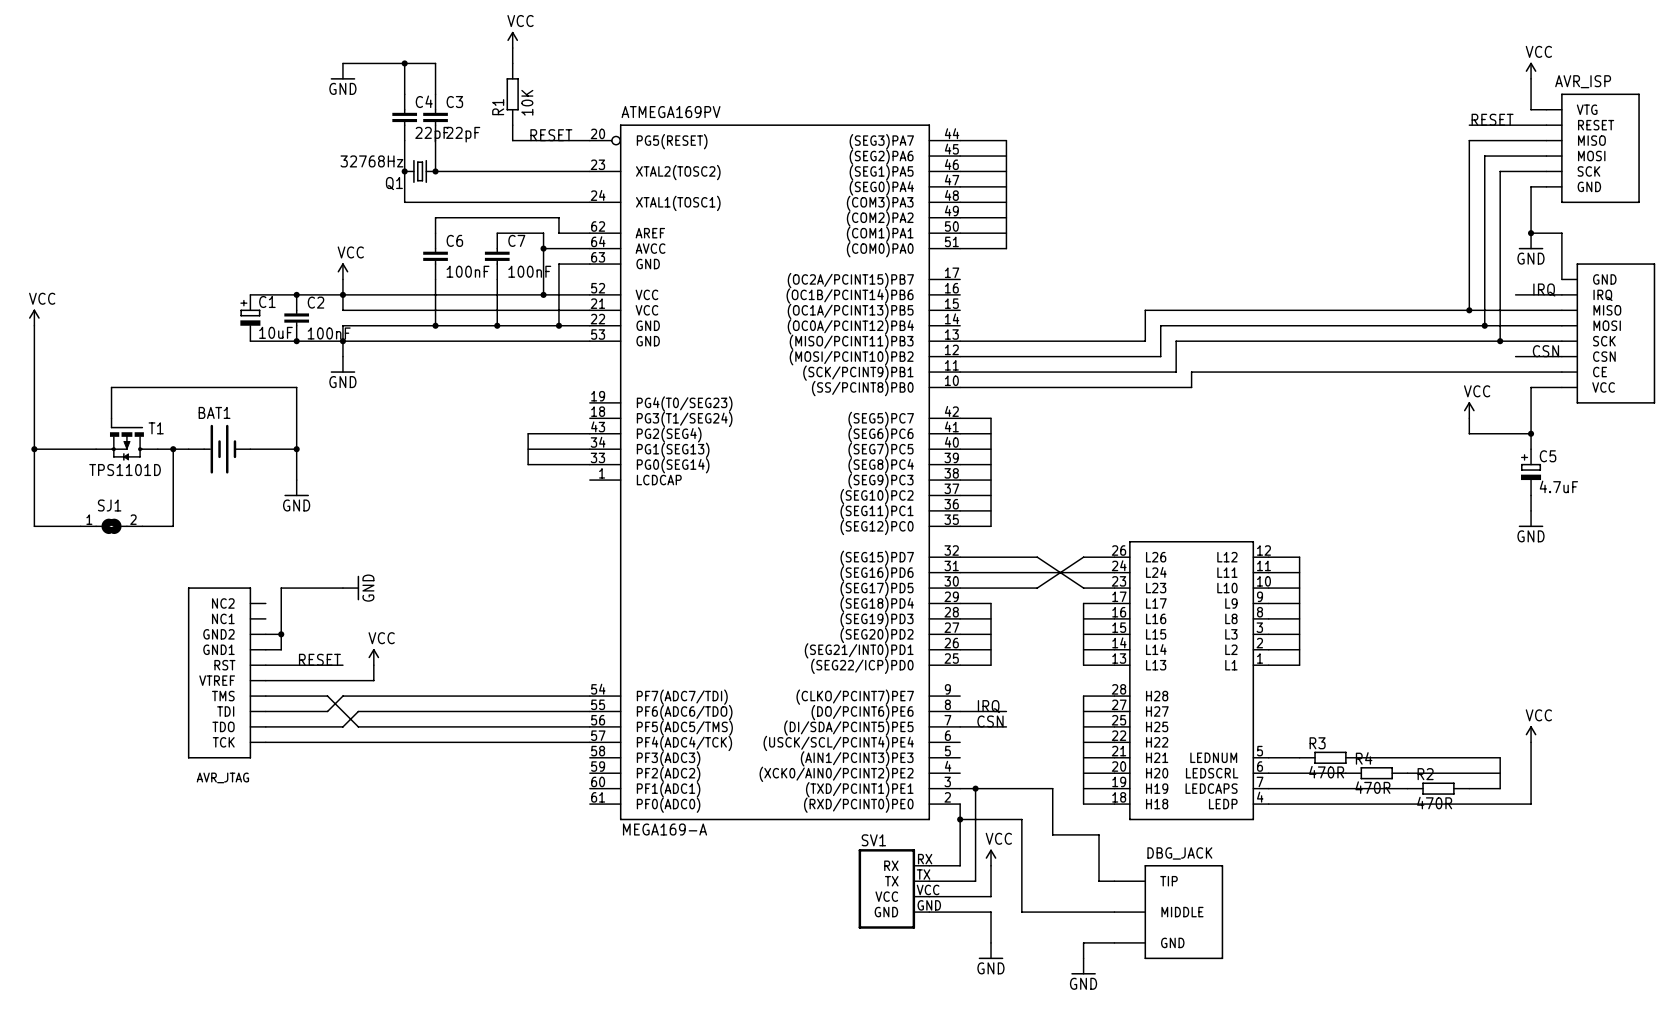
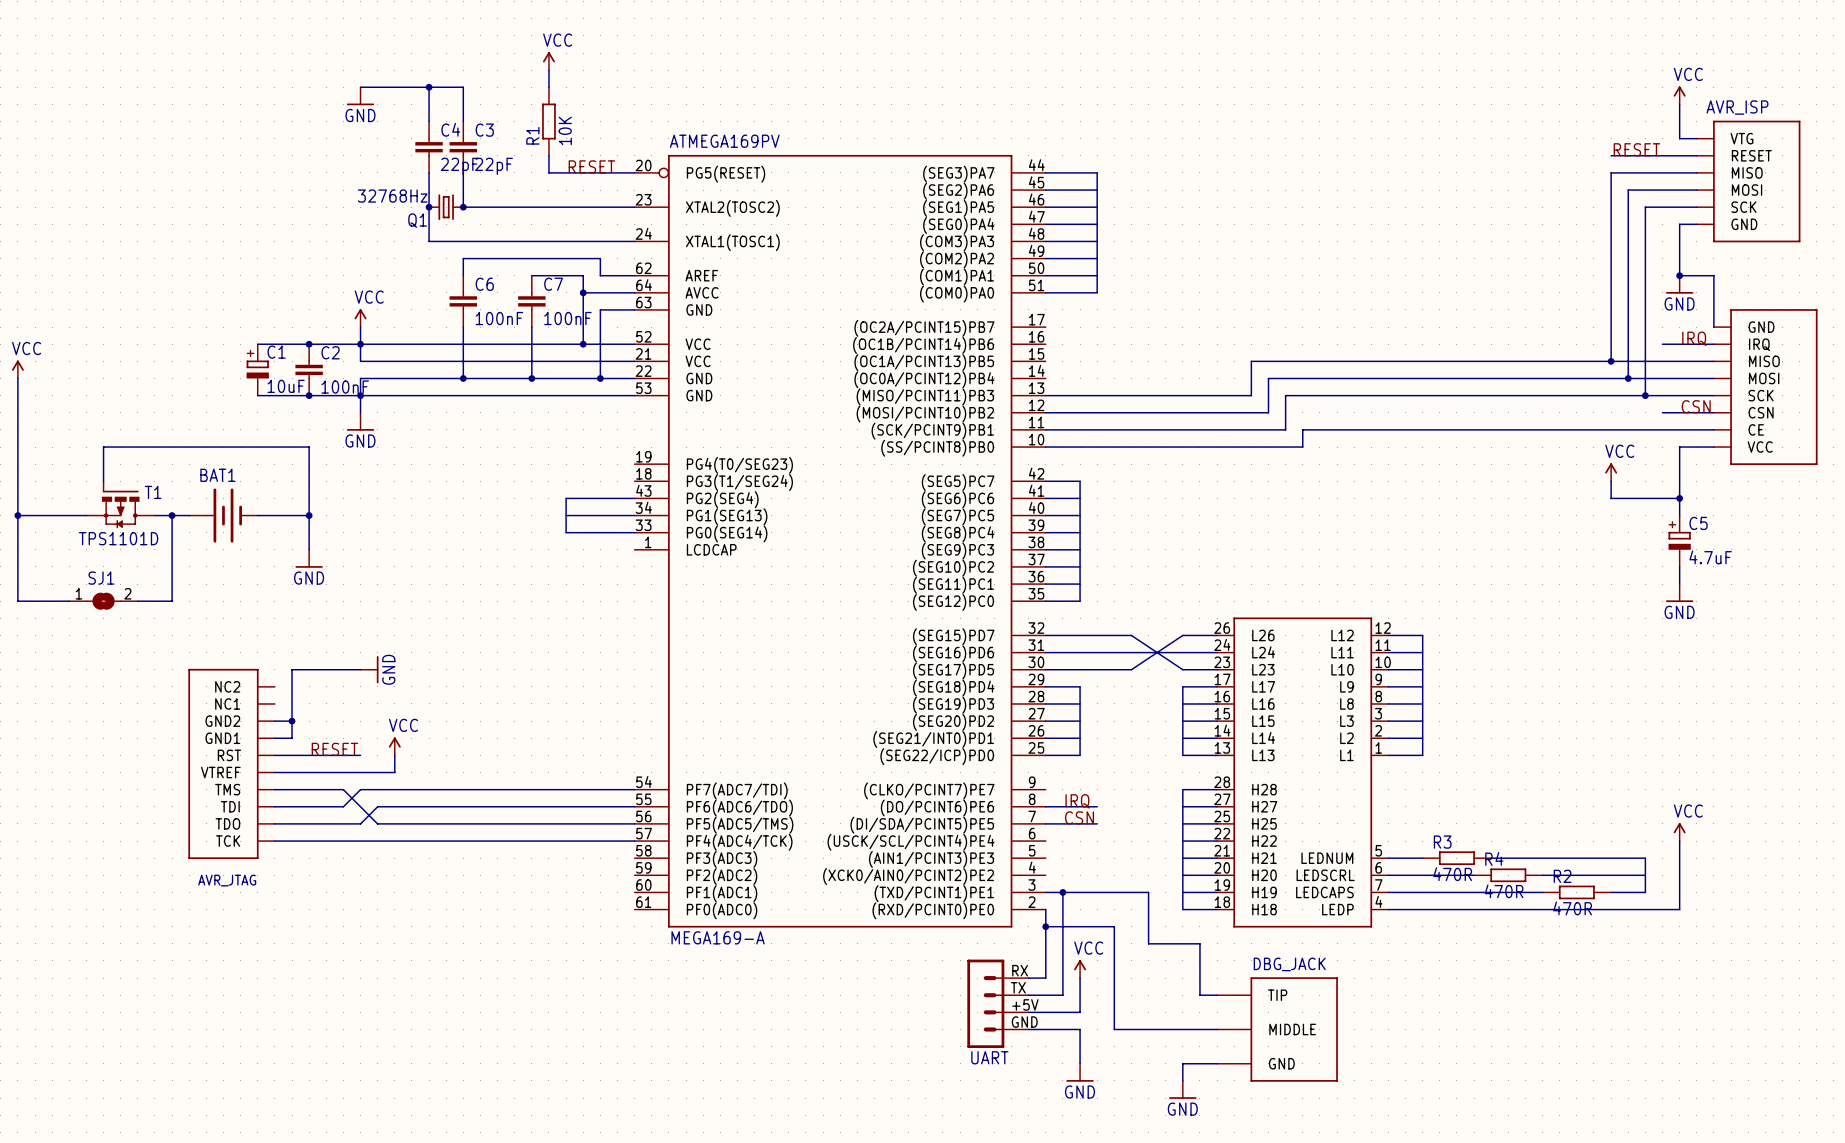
SV1: (893, 888) -> none
UART: none -> (997, 1003)

